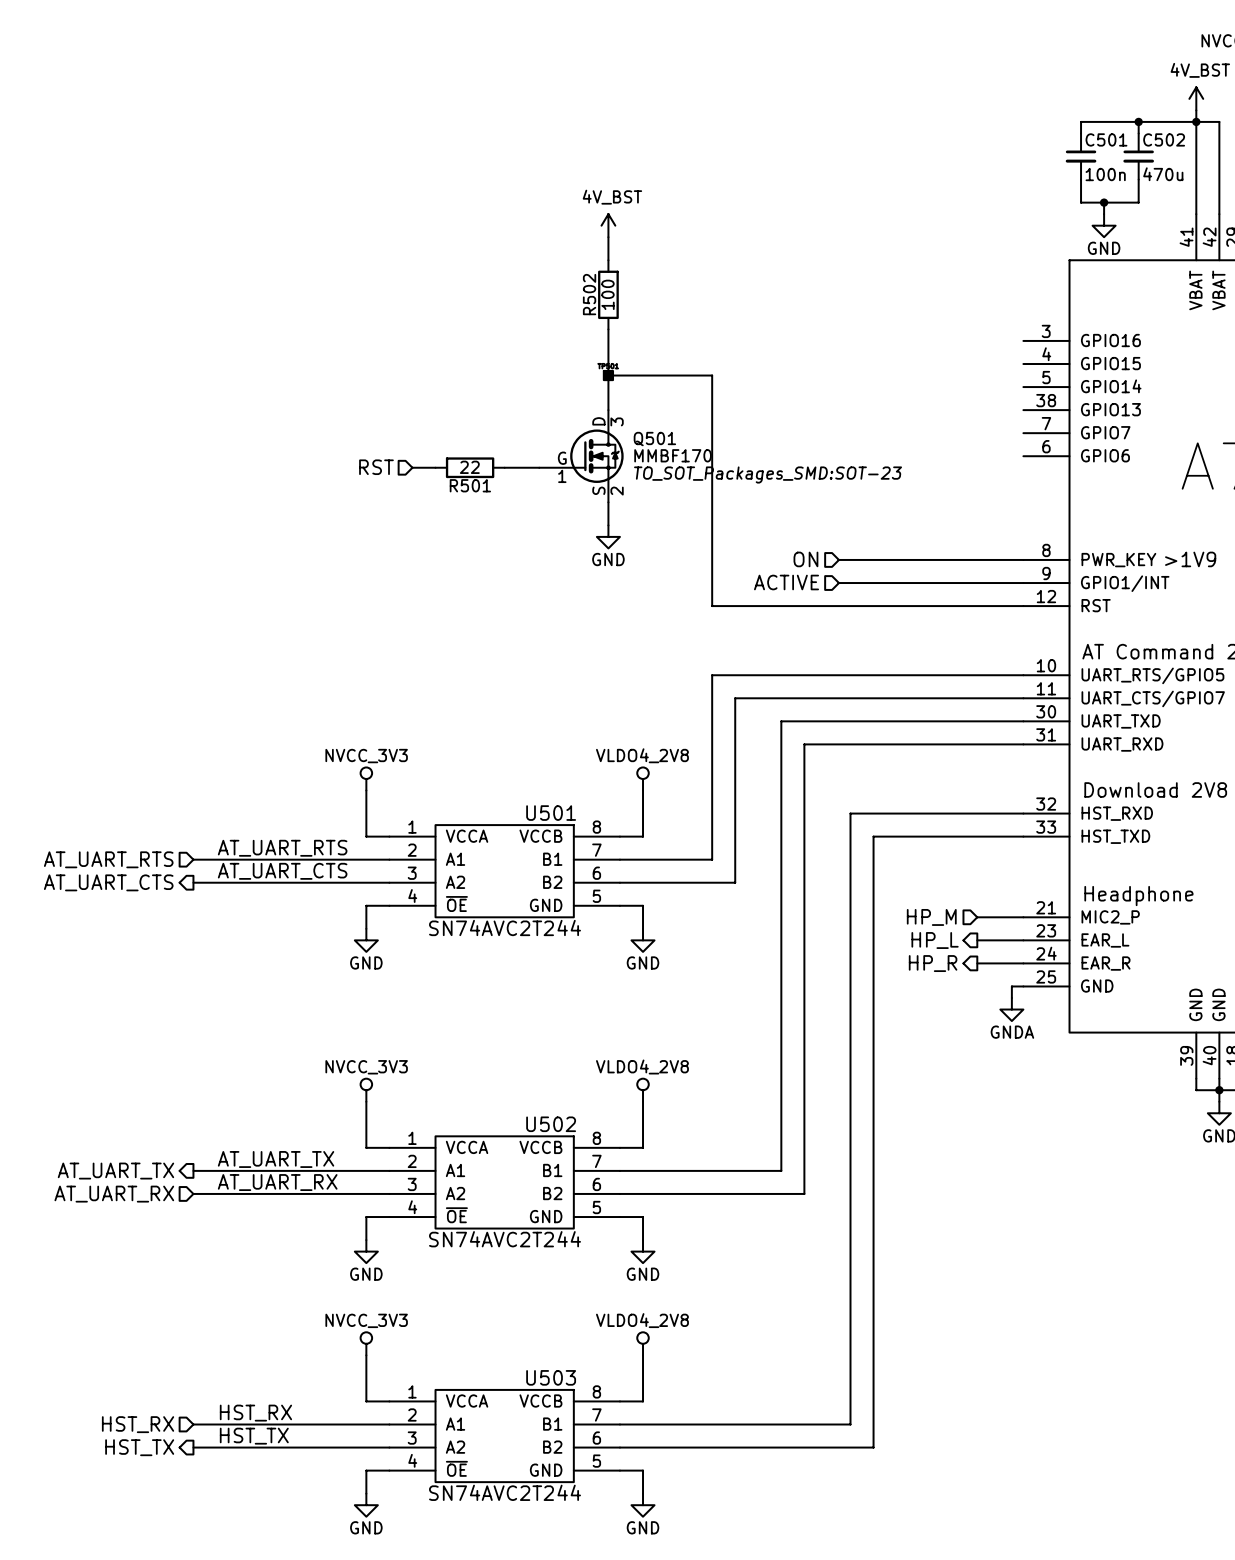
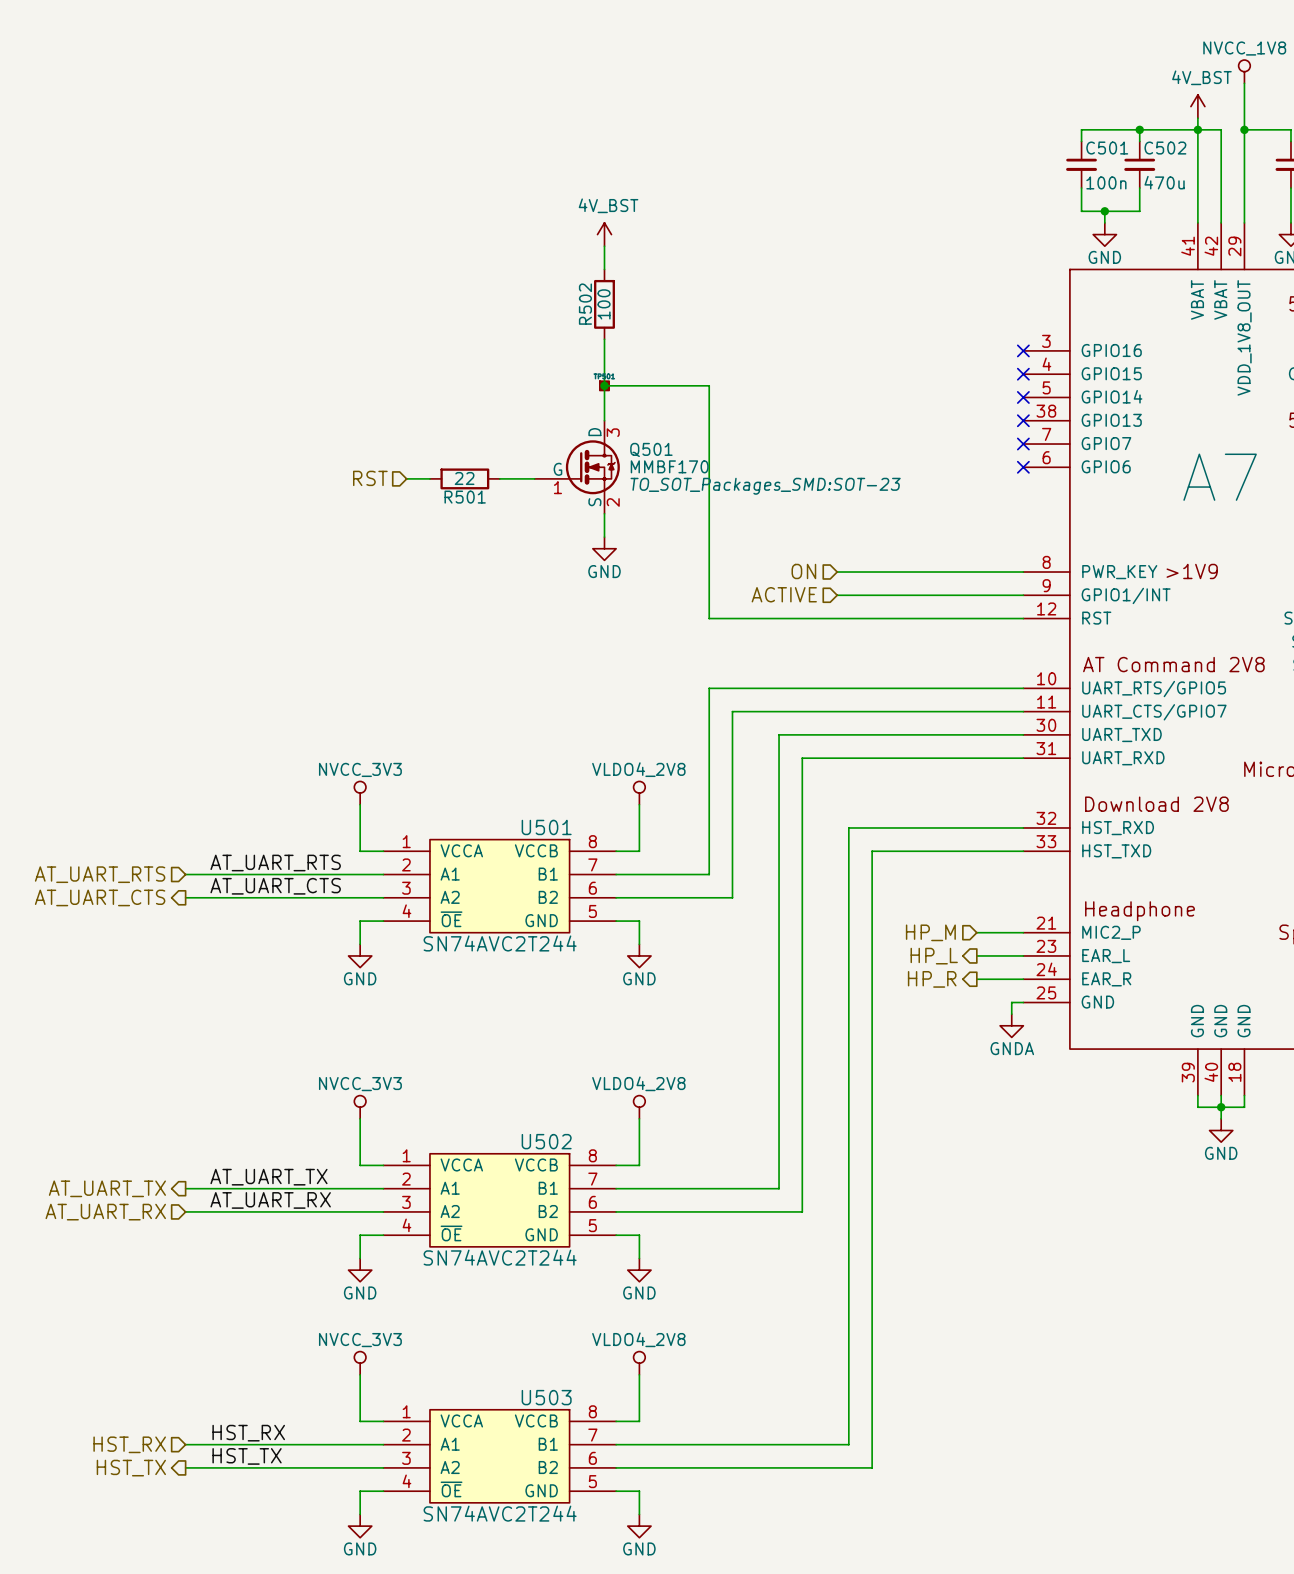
no-connect mark: none -> (1023, 350)
no-connect mark: none -> (1023, 374)
no-connect mark: none -> (1023, 397)
no-connect mark: none -> (1023, 420)
no-connect mark: none -> (1023, 444)
no-connect mark: none -> (1023, 467)

